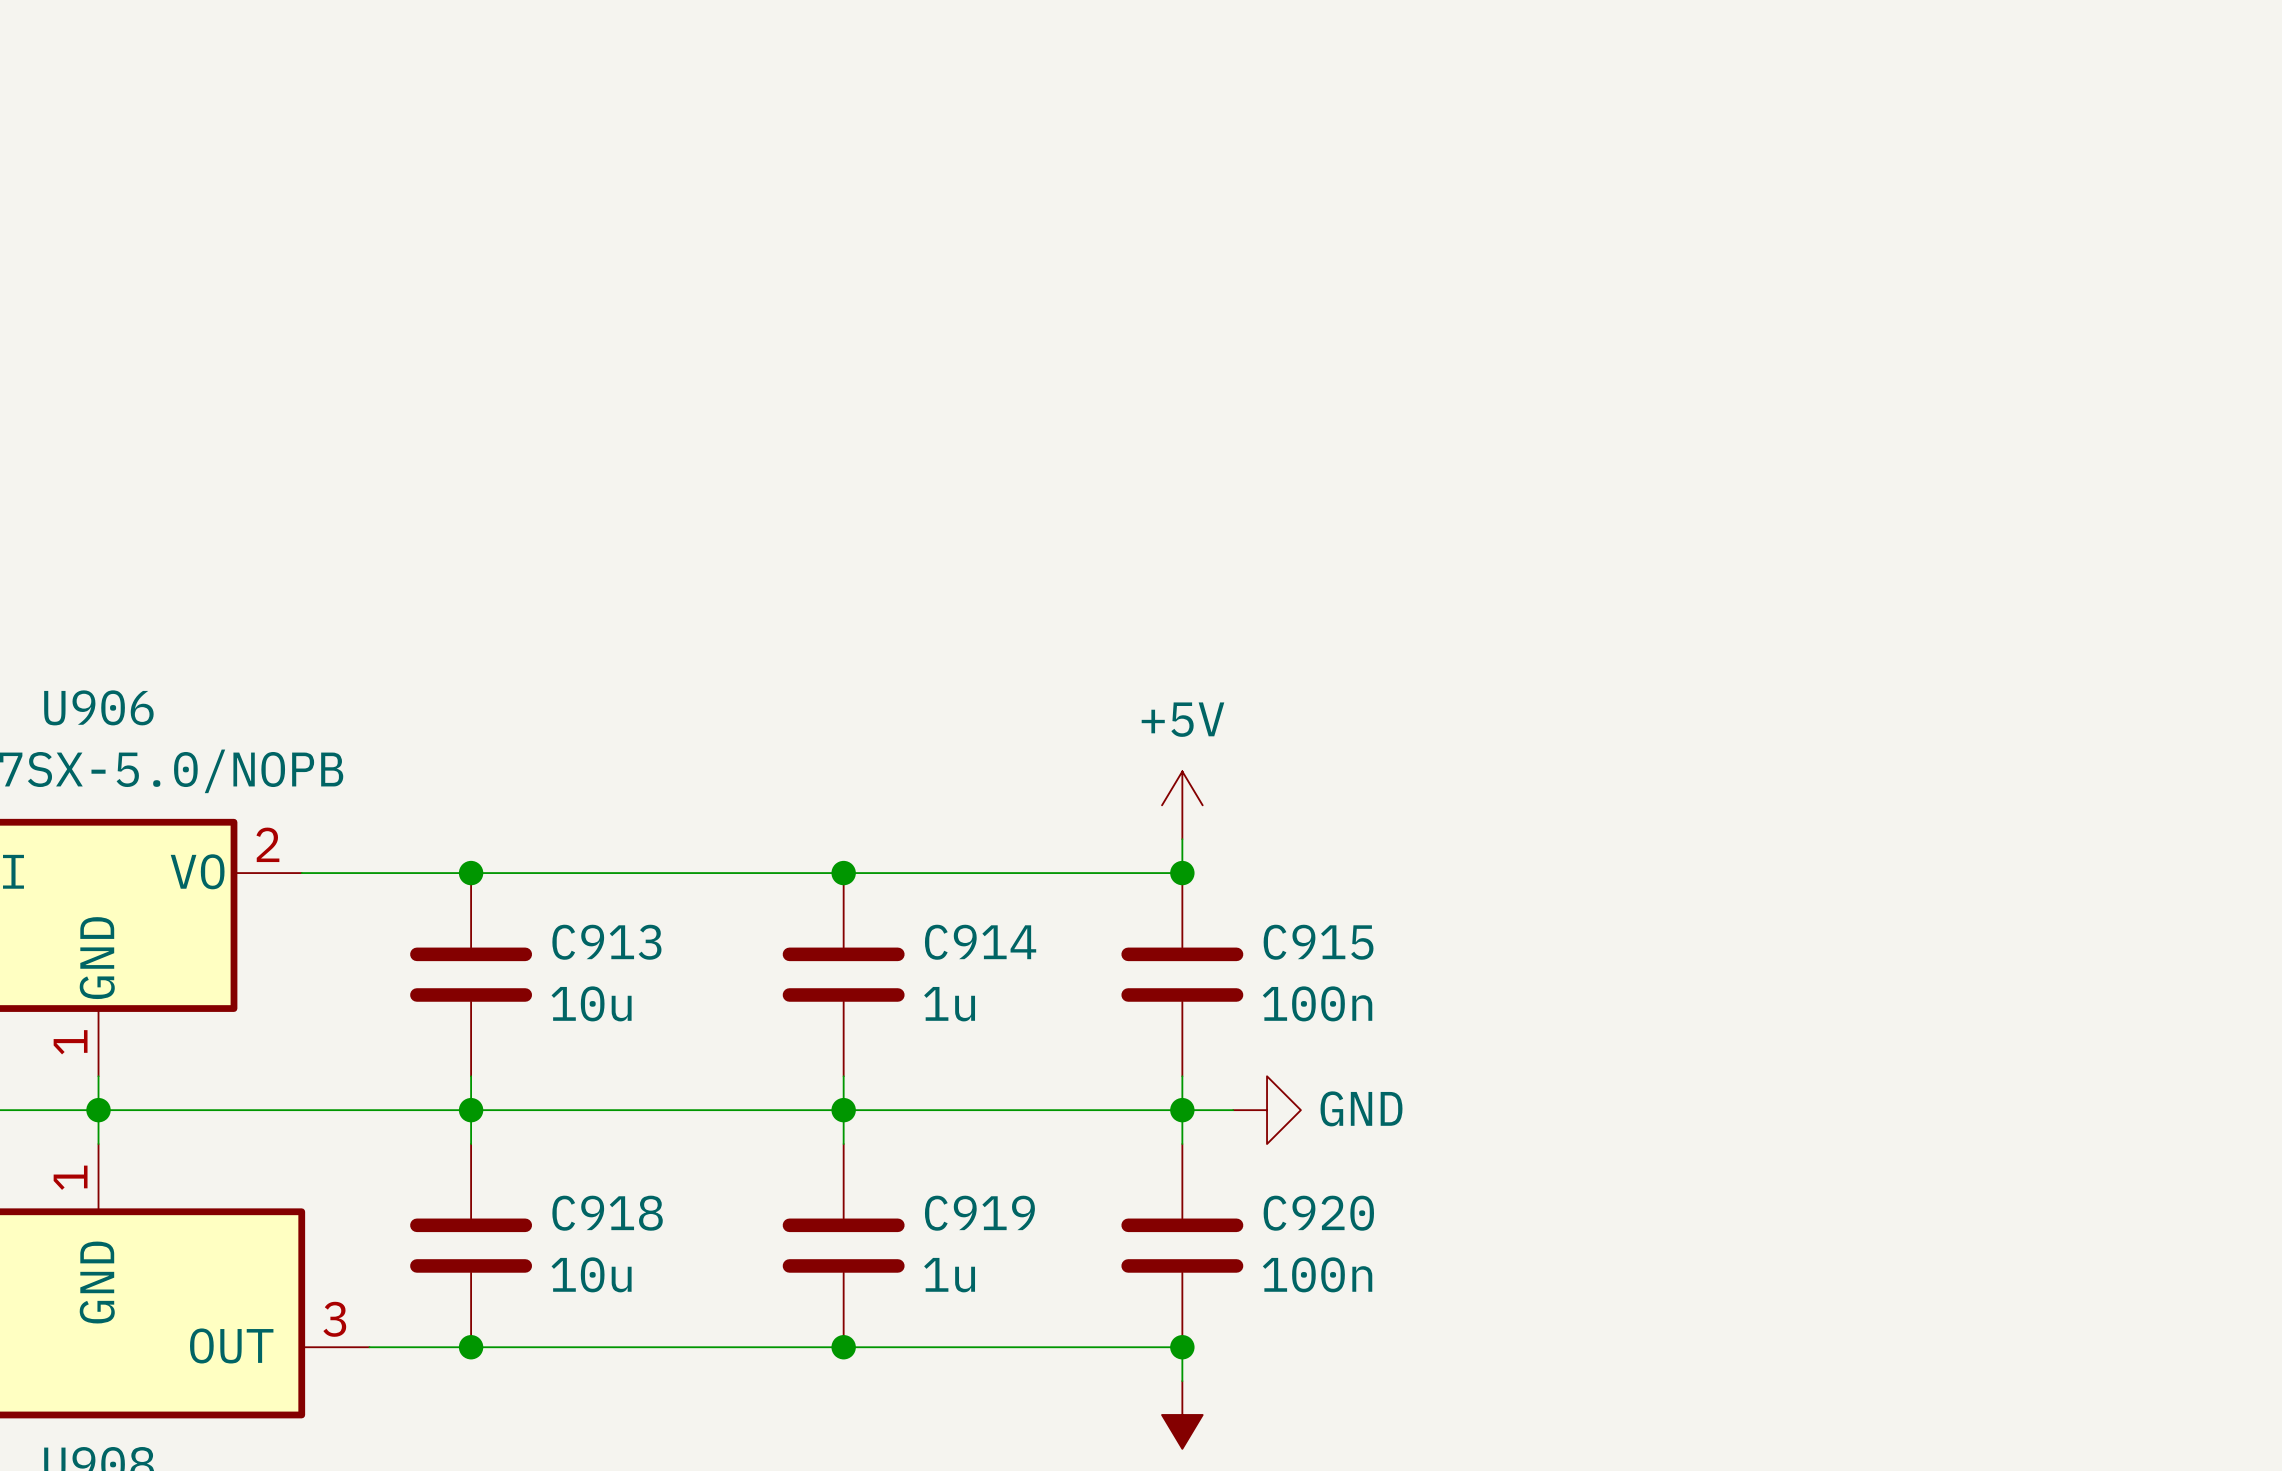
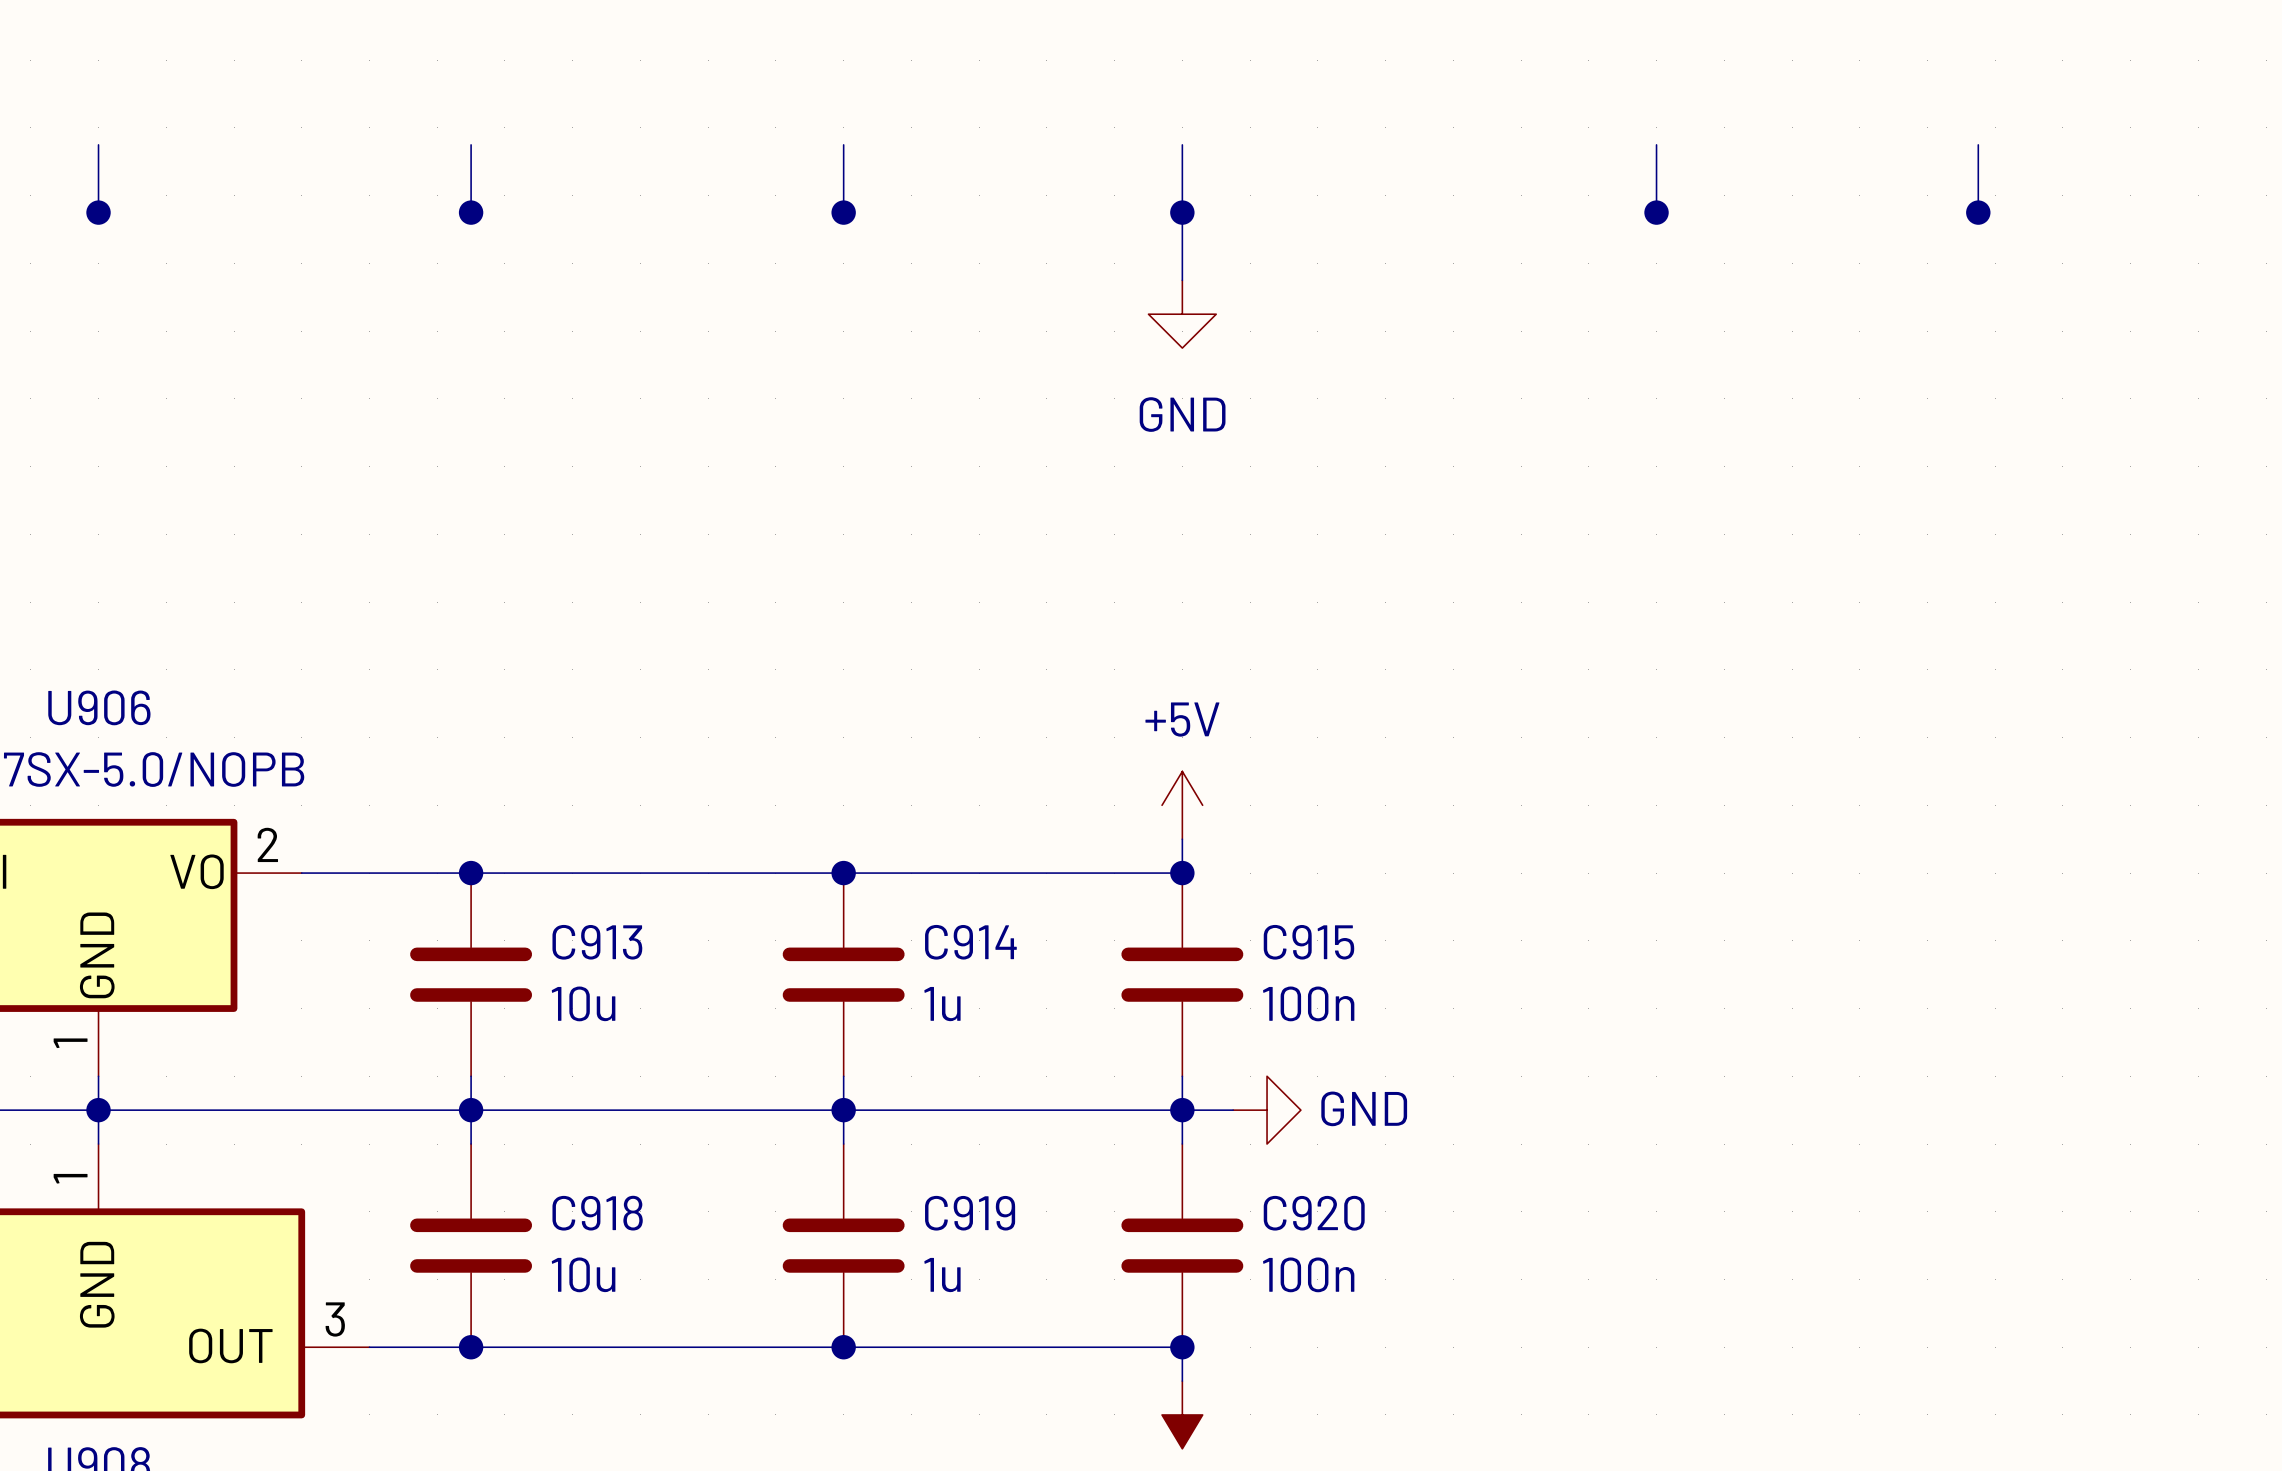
wire: none -> (98, 144) (98, 212)
wire: none -> (471, 144) (471, 212)
wire: none -> (843, 144) (843, 212)
wire: none -> (1182, 144) (1182, 280)
wire: none -> (1656, 144) (1656, 212)
wire: none -> (1978, 144) (1978, 212)
junction: none -> (98, 212)
junction: none -> (471, 212)
junction: none -> (843, 212)
junction: none -> (1182, 212)
junction: none -> (1656, 212)
junction: none -> (1978, 212)
power symbol: none -> GND (1182, 314)

